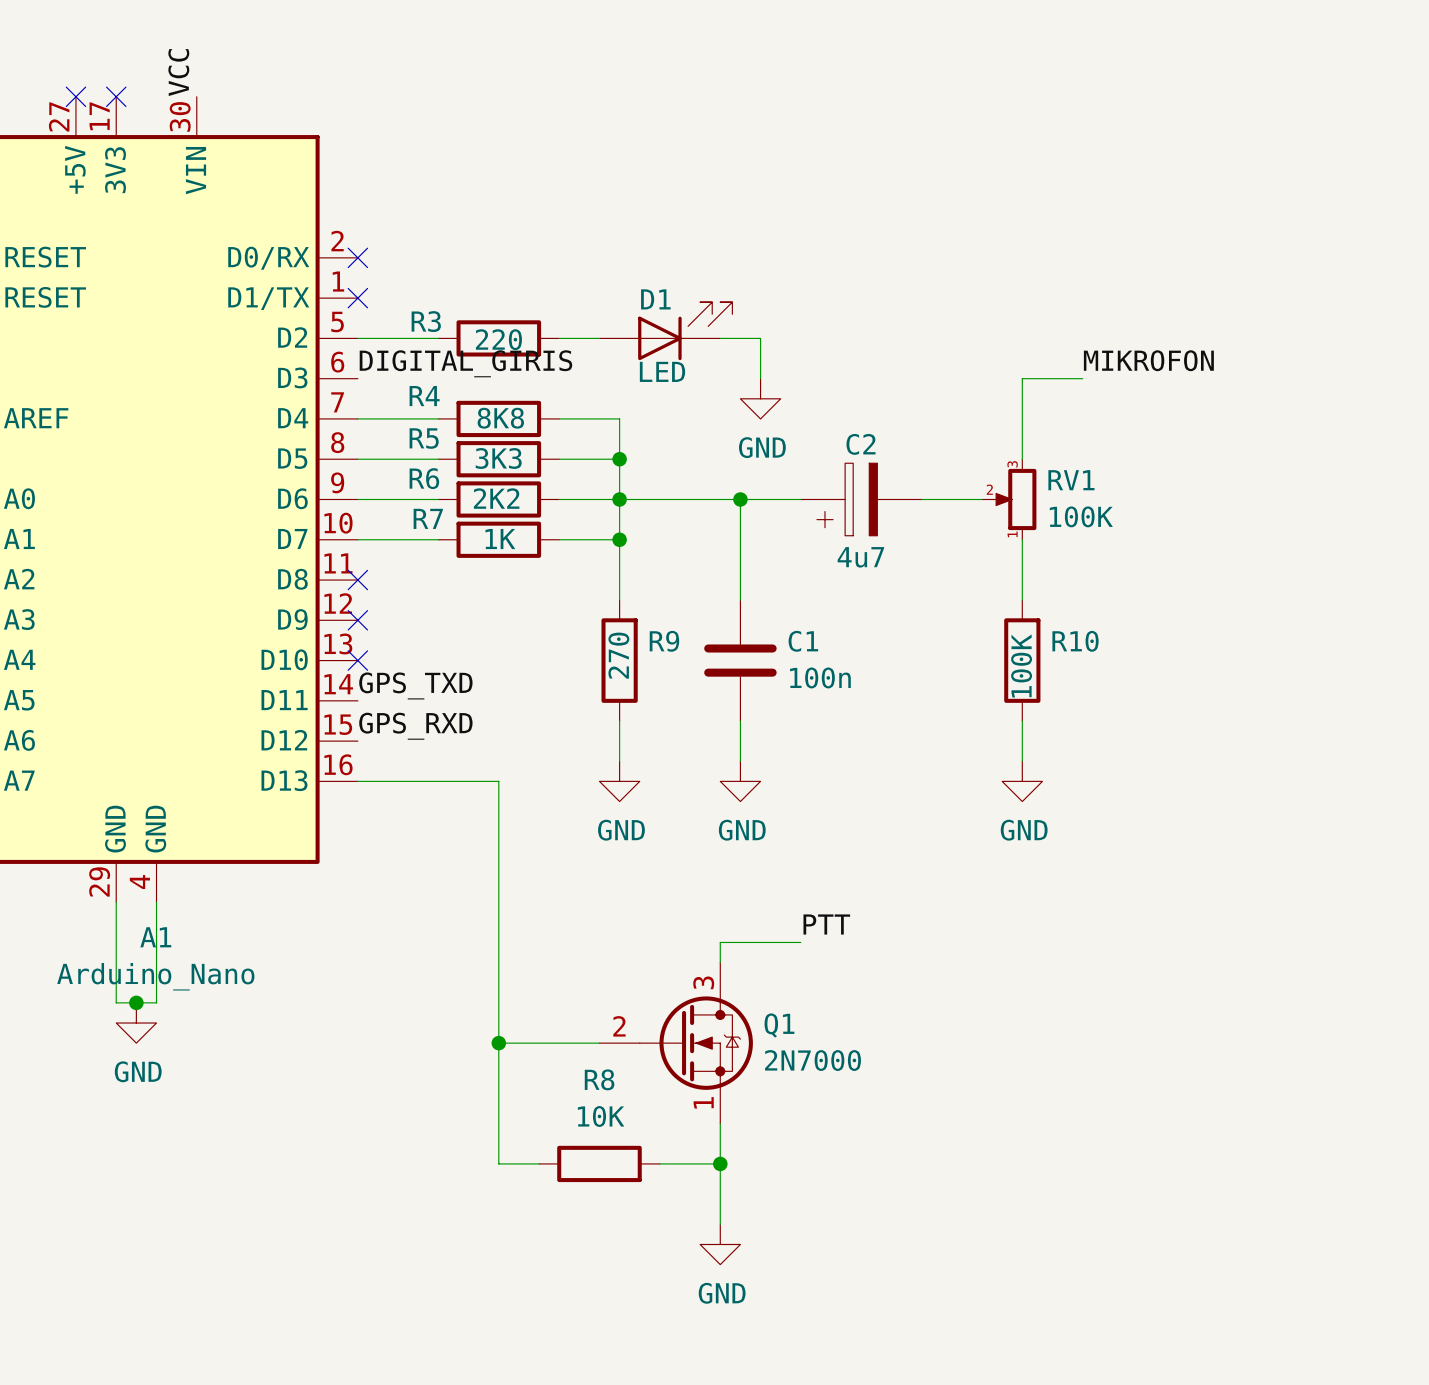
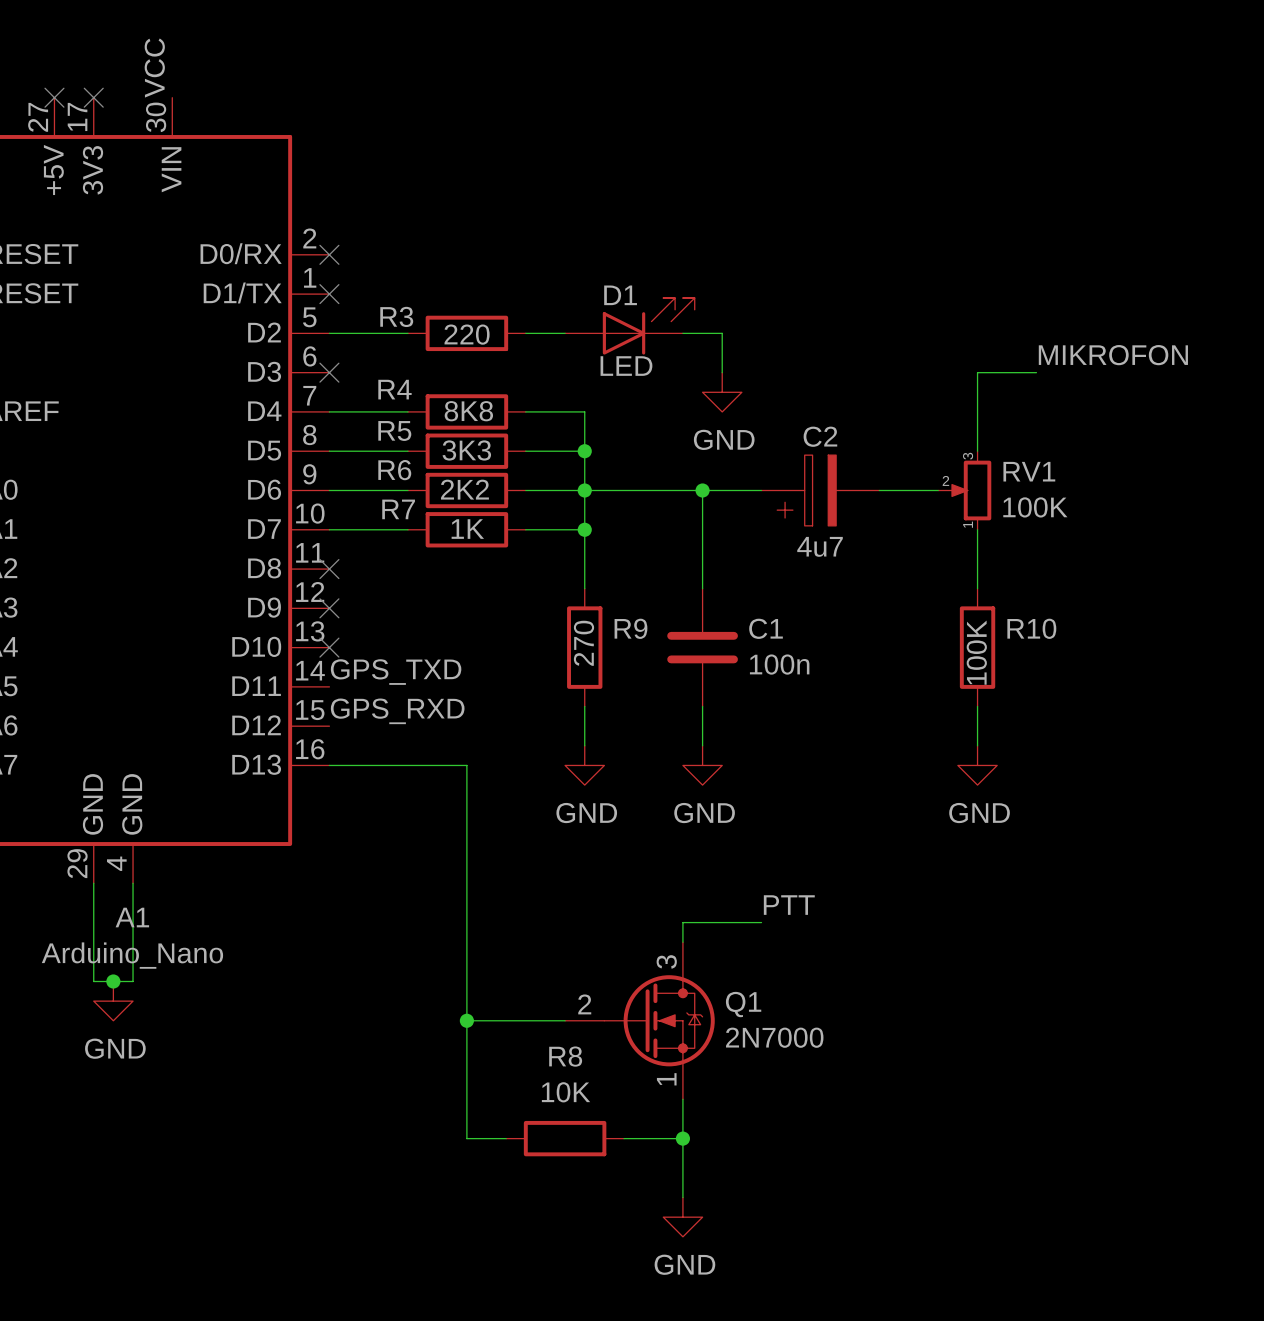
label: DIGITAL_GIRIS (465, 363) -> none
no-connect mark: none -> (329, 372)

